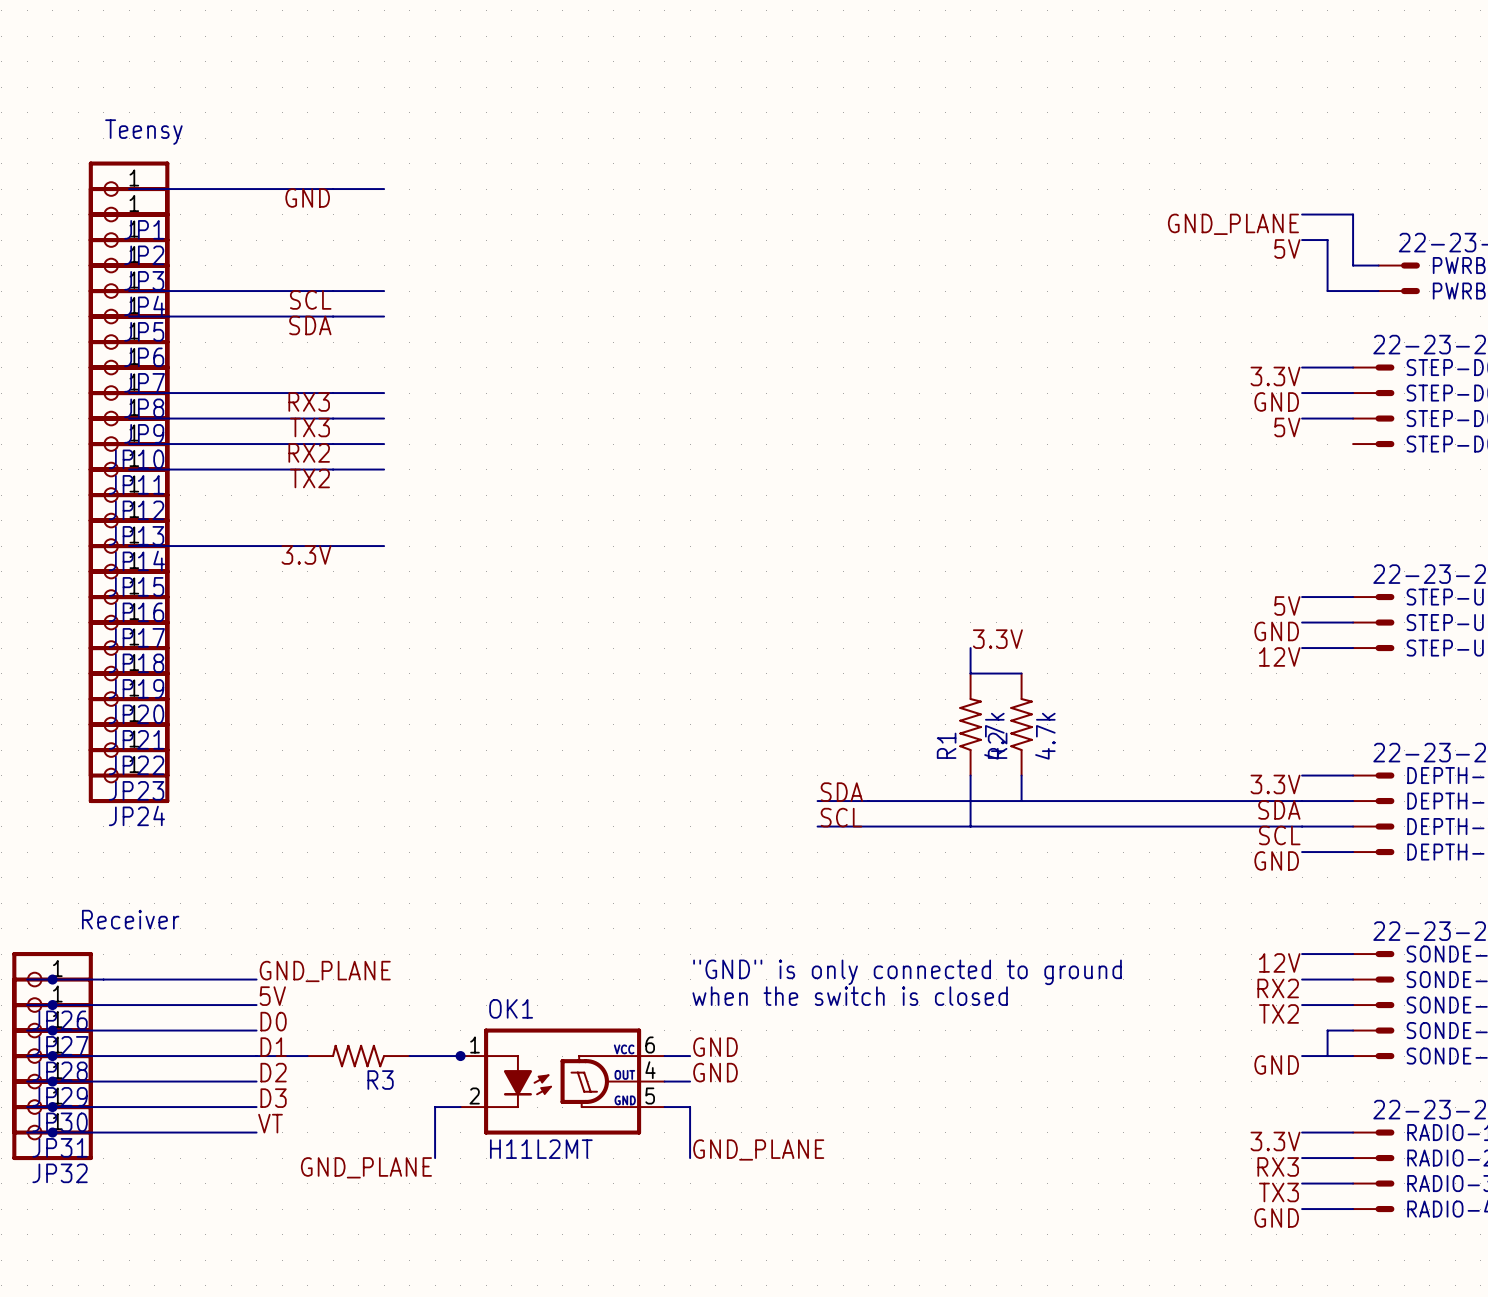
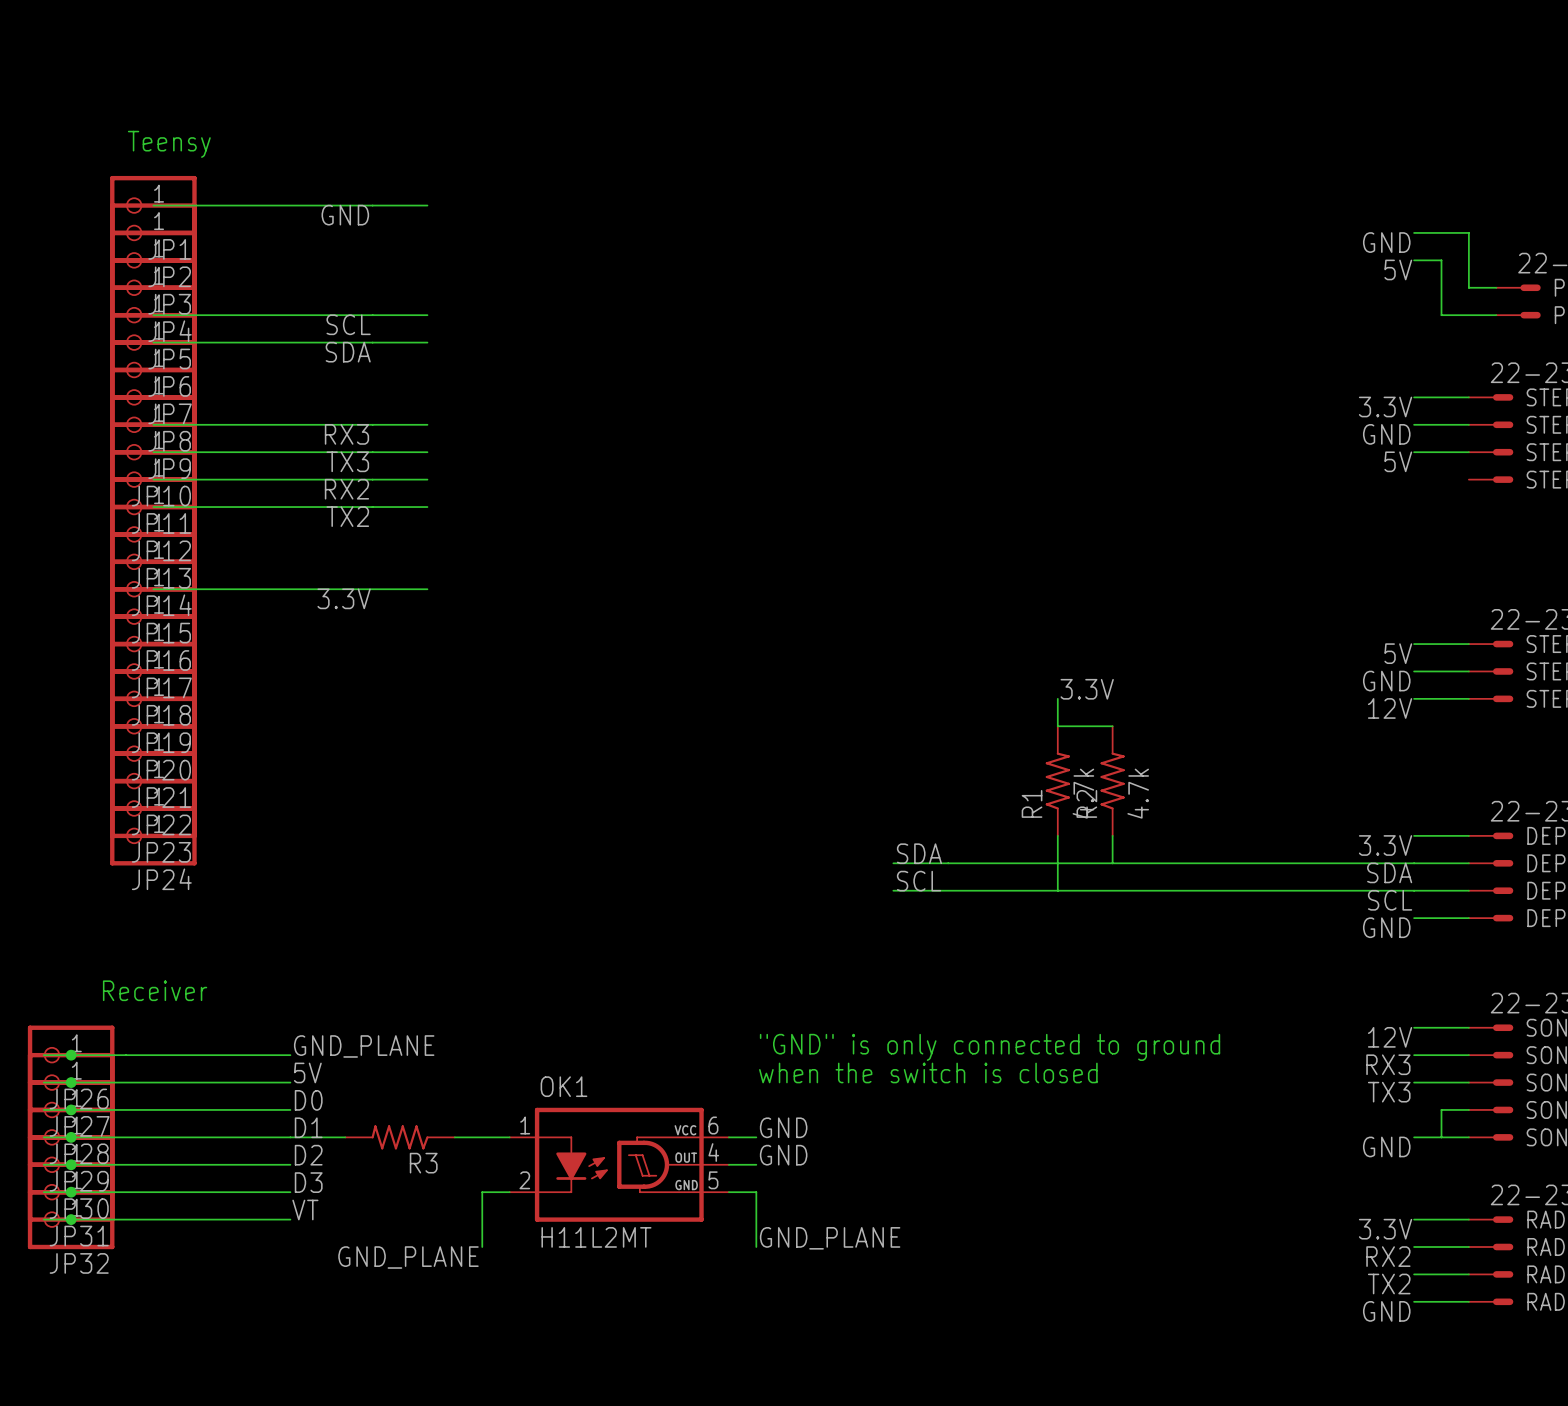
label: GND_PLANE (1233, 224) -> GND (1386, 242)
label: RX2 (1278, 988) -> RX3 (1388, 1064)
label: TX2 (1278, 1013) -> TX3 (1389, 1092)
junction: (460, 1056) -> none
label: RX3 (1278, 1166) -> RX2 (1388, 1256)
label: TX3 (1278, 1192) -> TX2 (1389, 1284)

